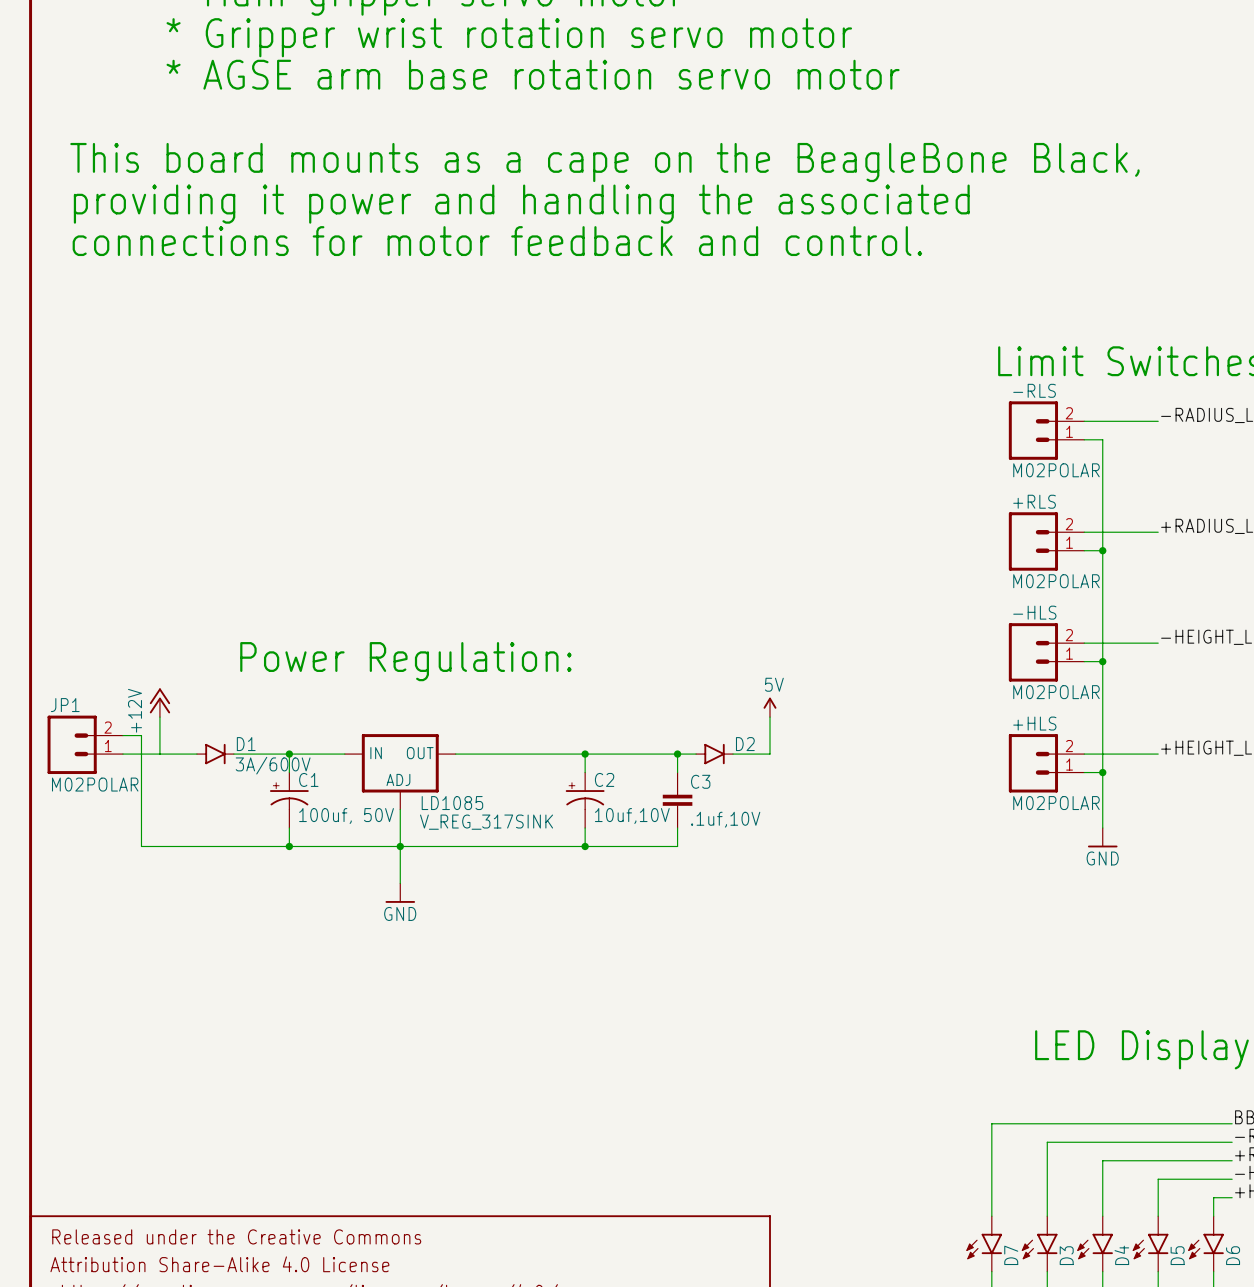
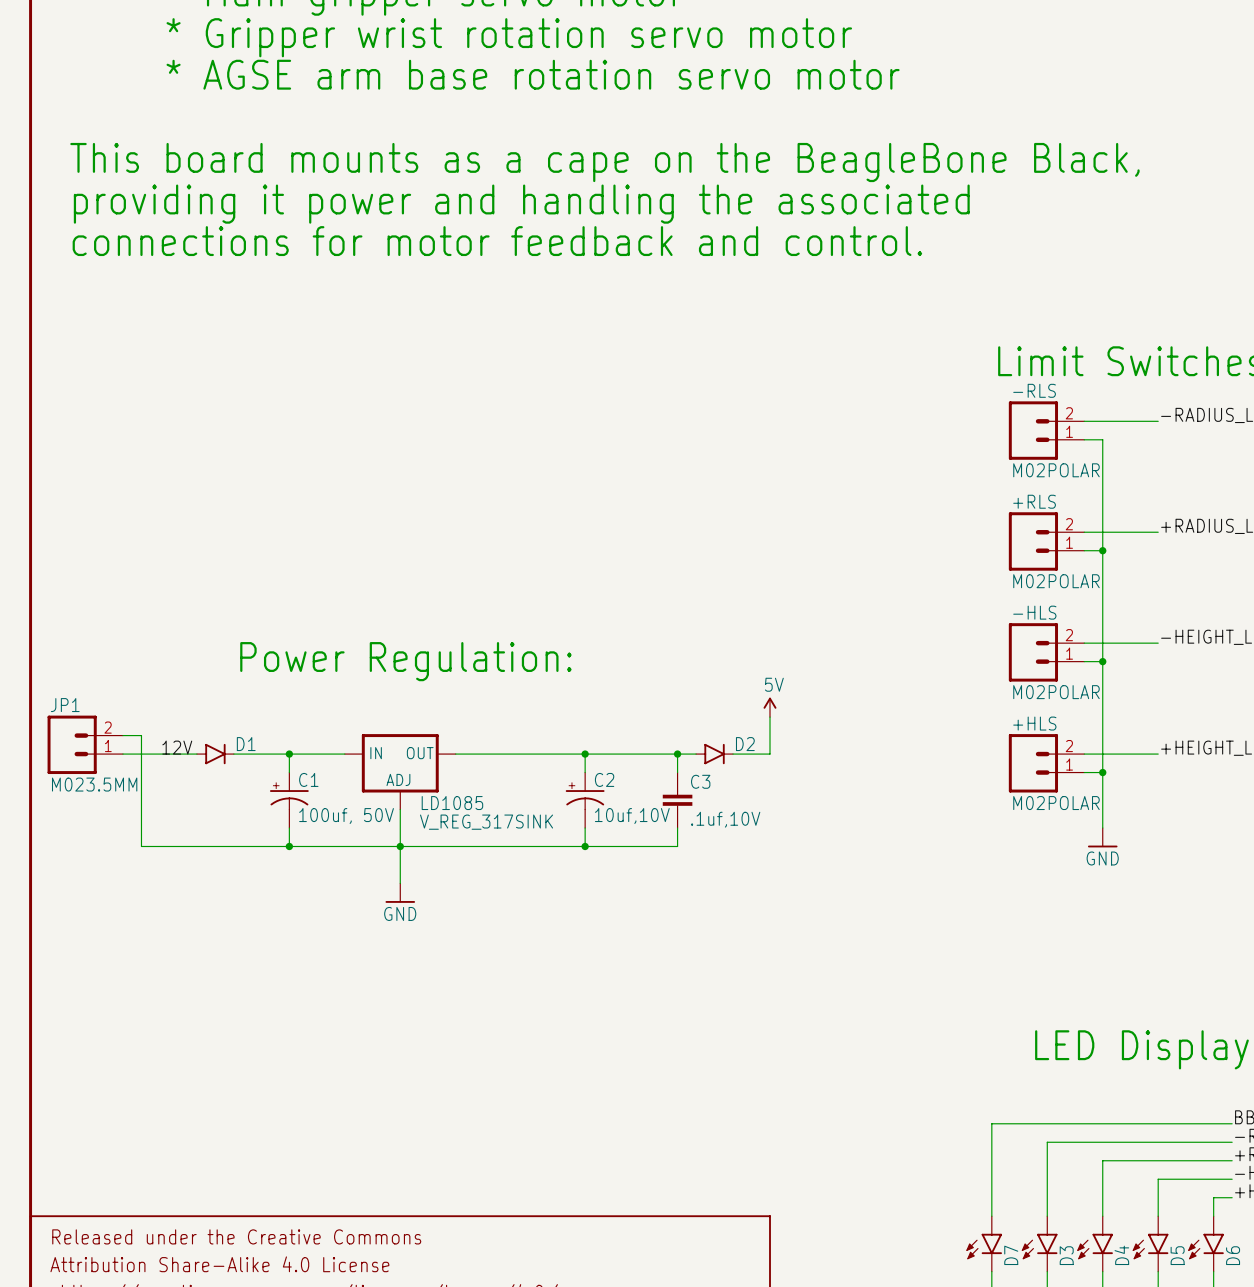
power symbol: +12V (159, 702) -> none
wire: (159, 717) (159, 754) -> none
label: none -> 12V (177, 747)
D1 value: 3A/600V (273, 765) -> none
JP1 value: M02POLAR (95, 784) -> M023.5MM (94, 784)

